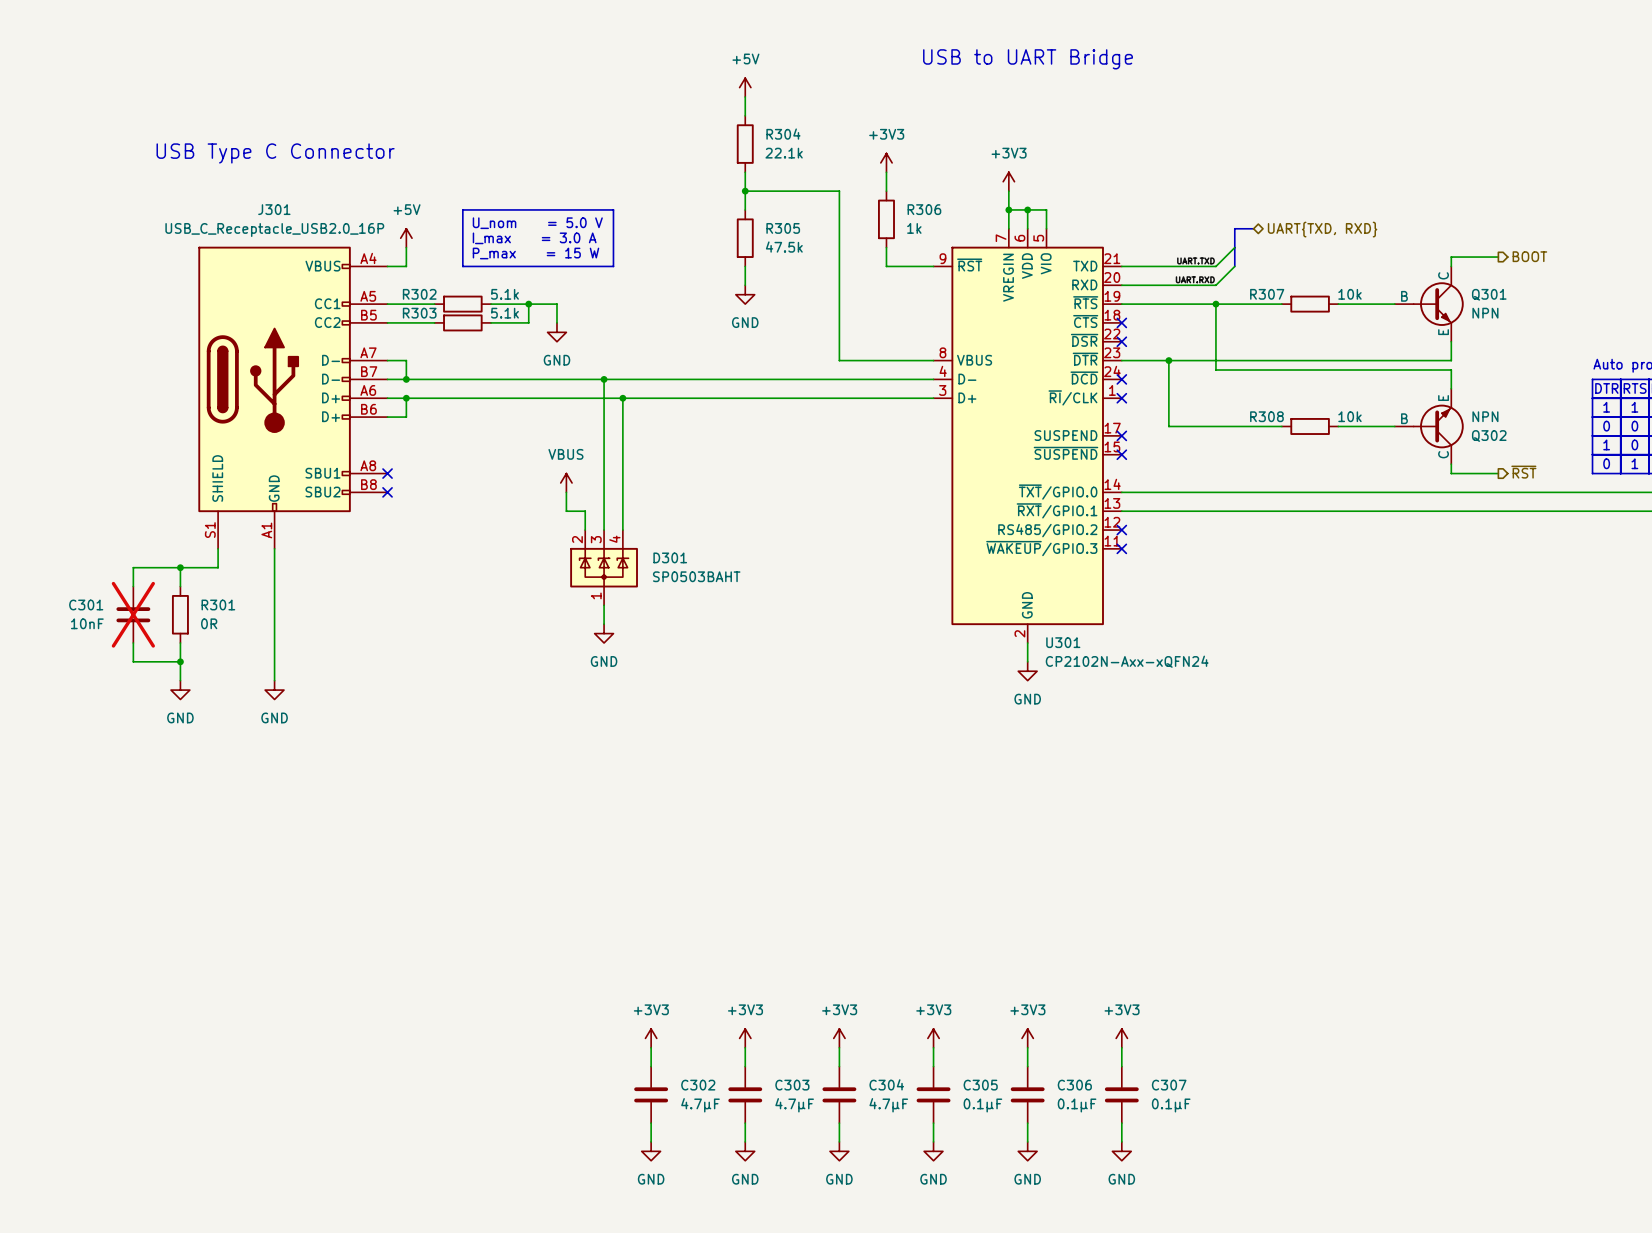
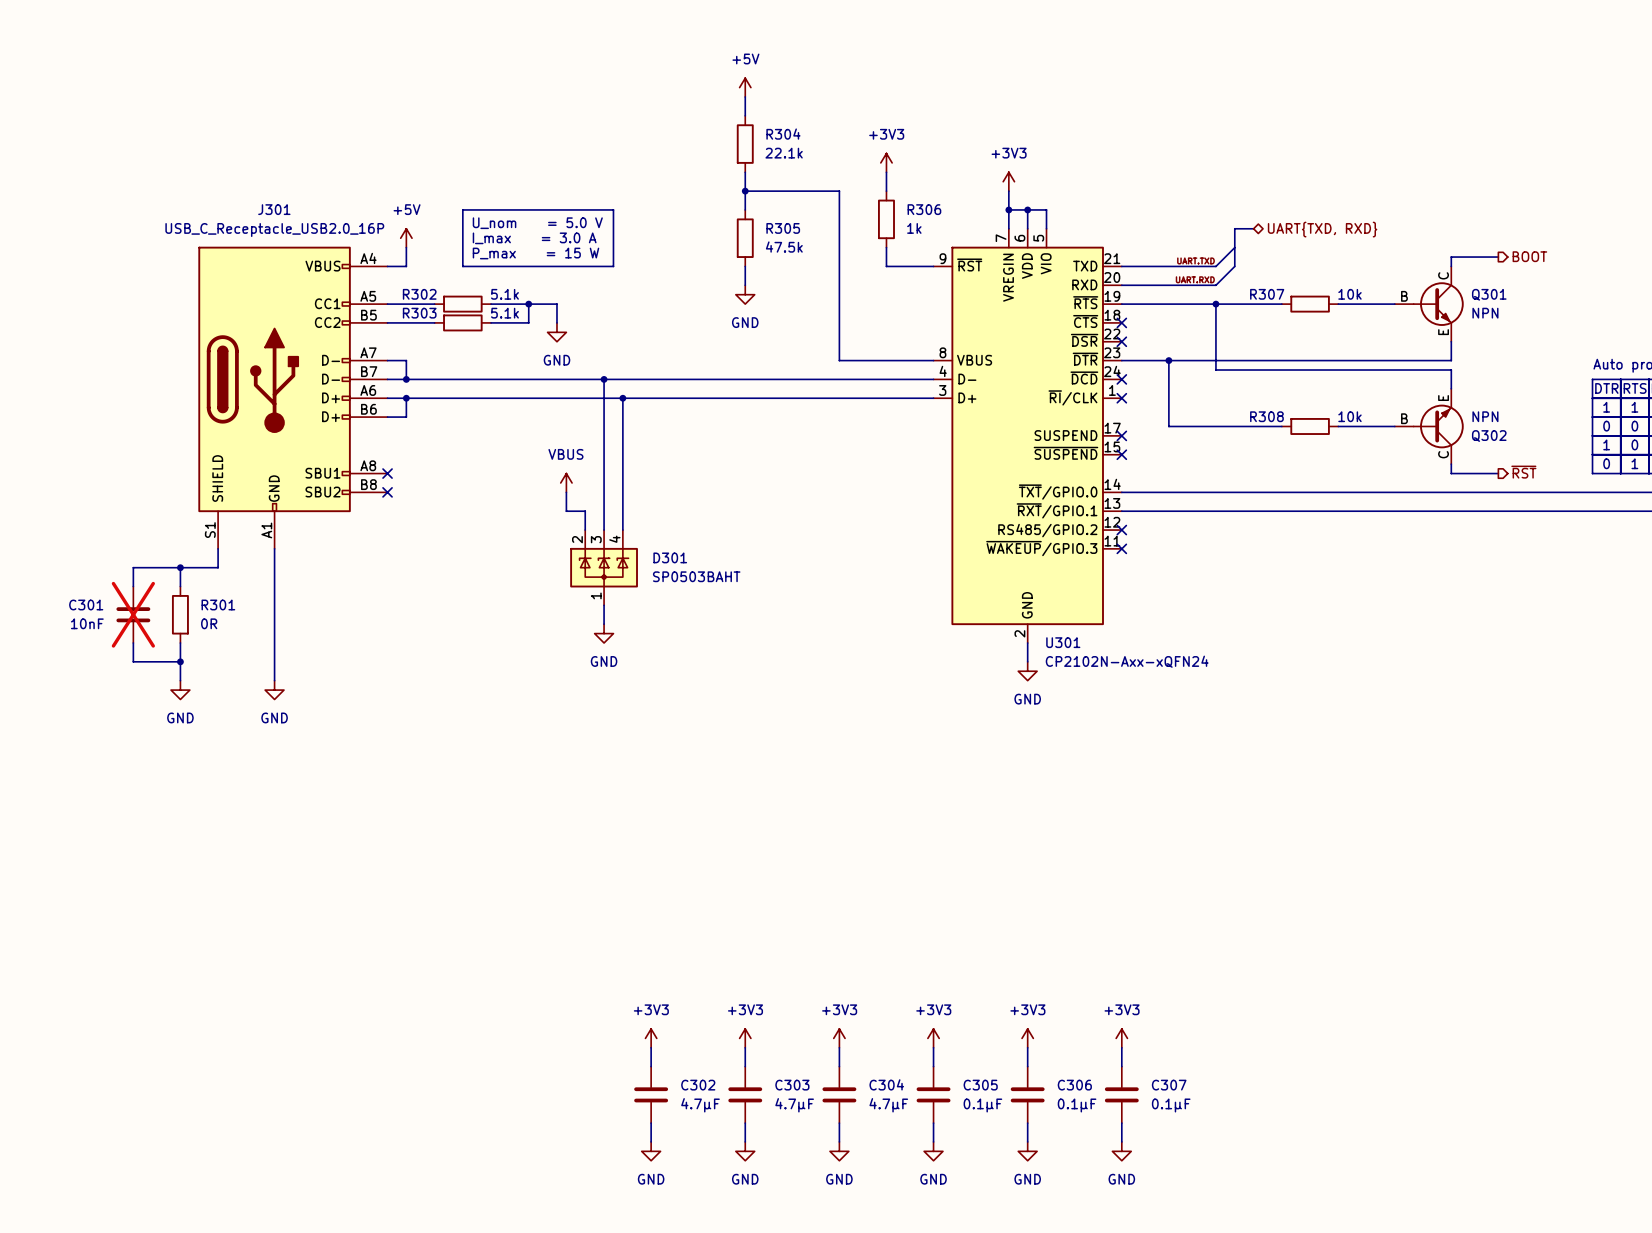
text: USB to UART Bridge (1028, 59) -> none
text: USB Type C Connector (275, 153) -> none

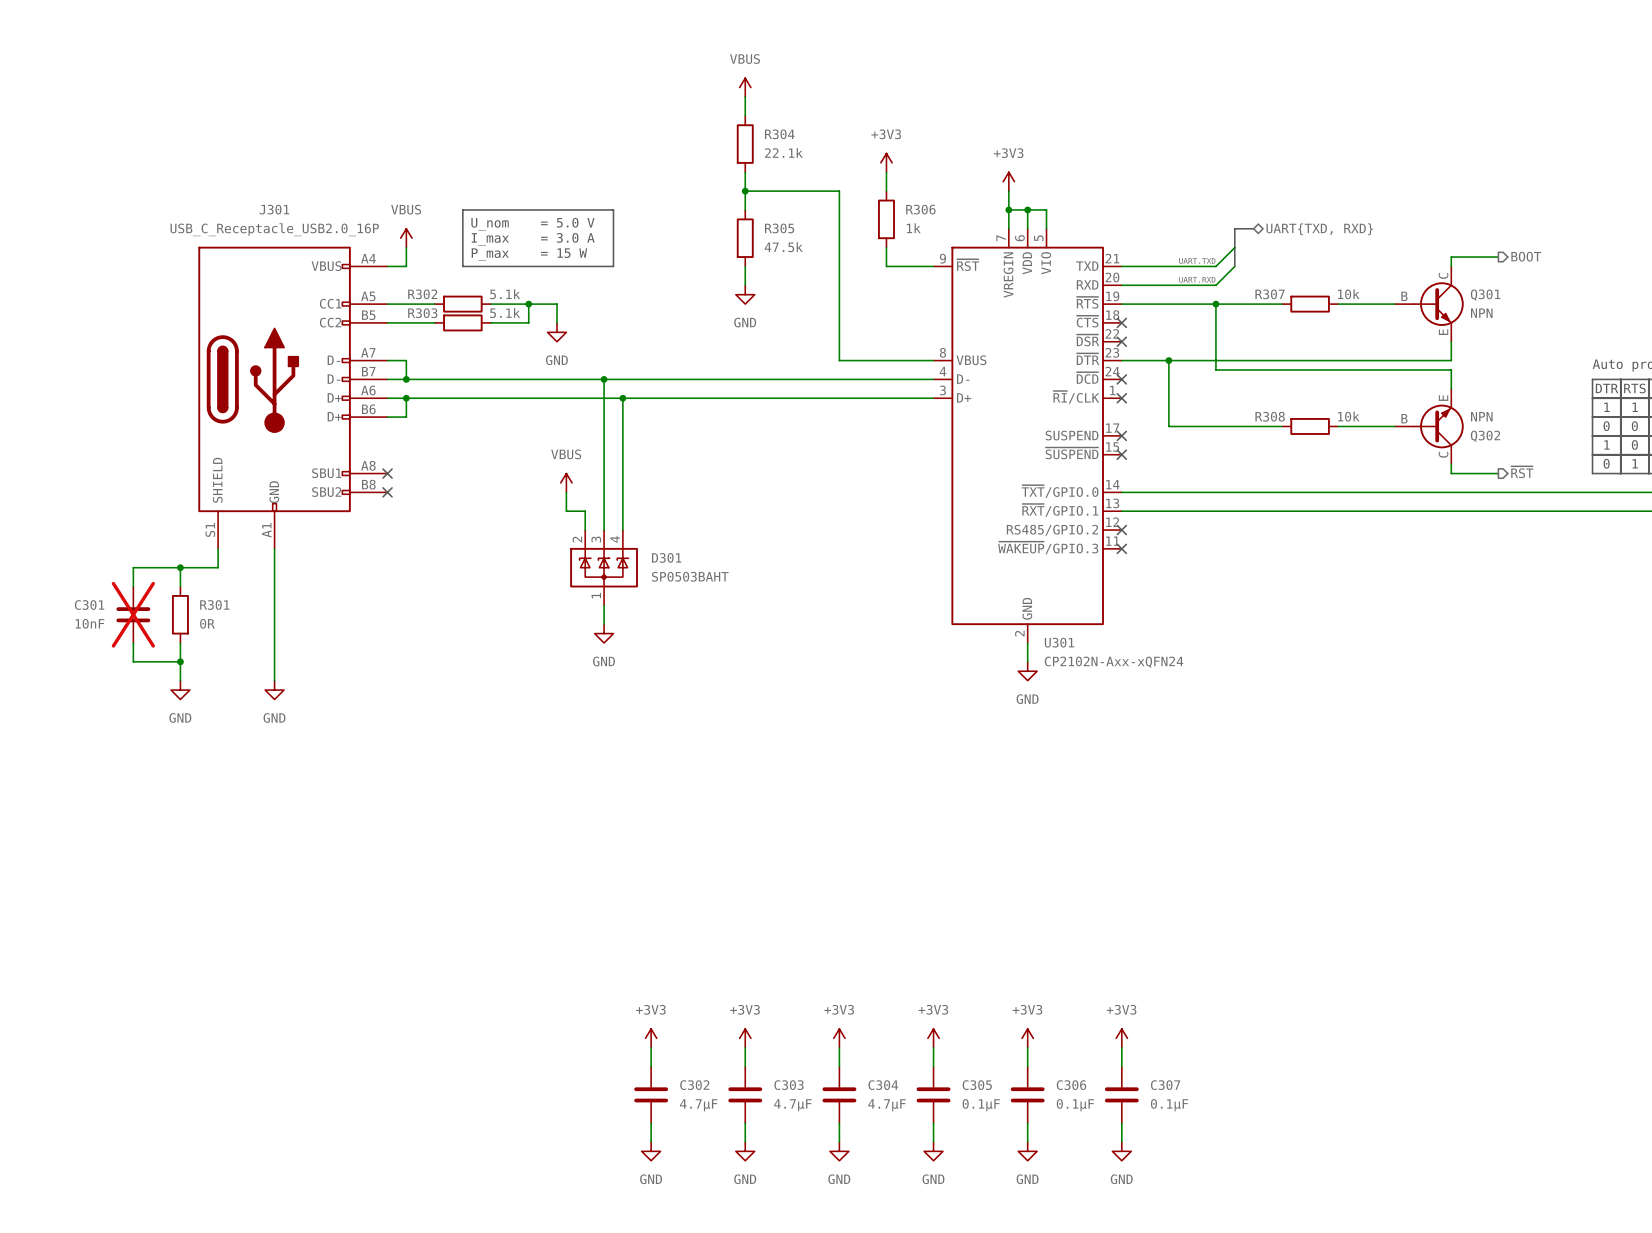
power symbol: +5V (745, 87) -> VBUS (745, 87)
power symbol: +5V (406, 238) -> VBUS (406, 238)

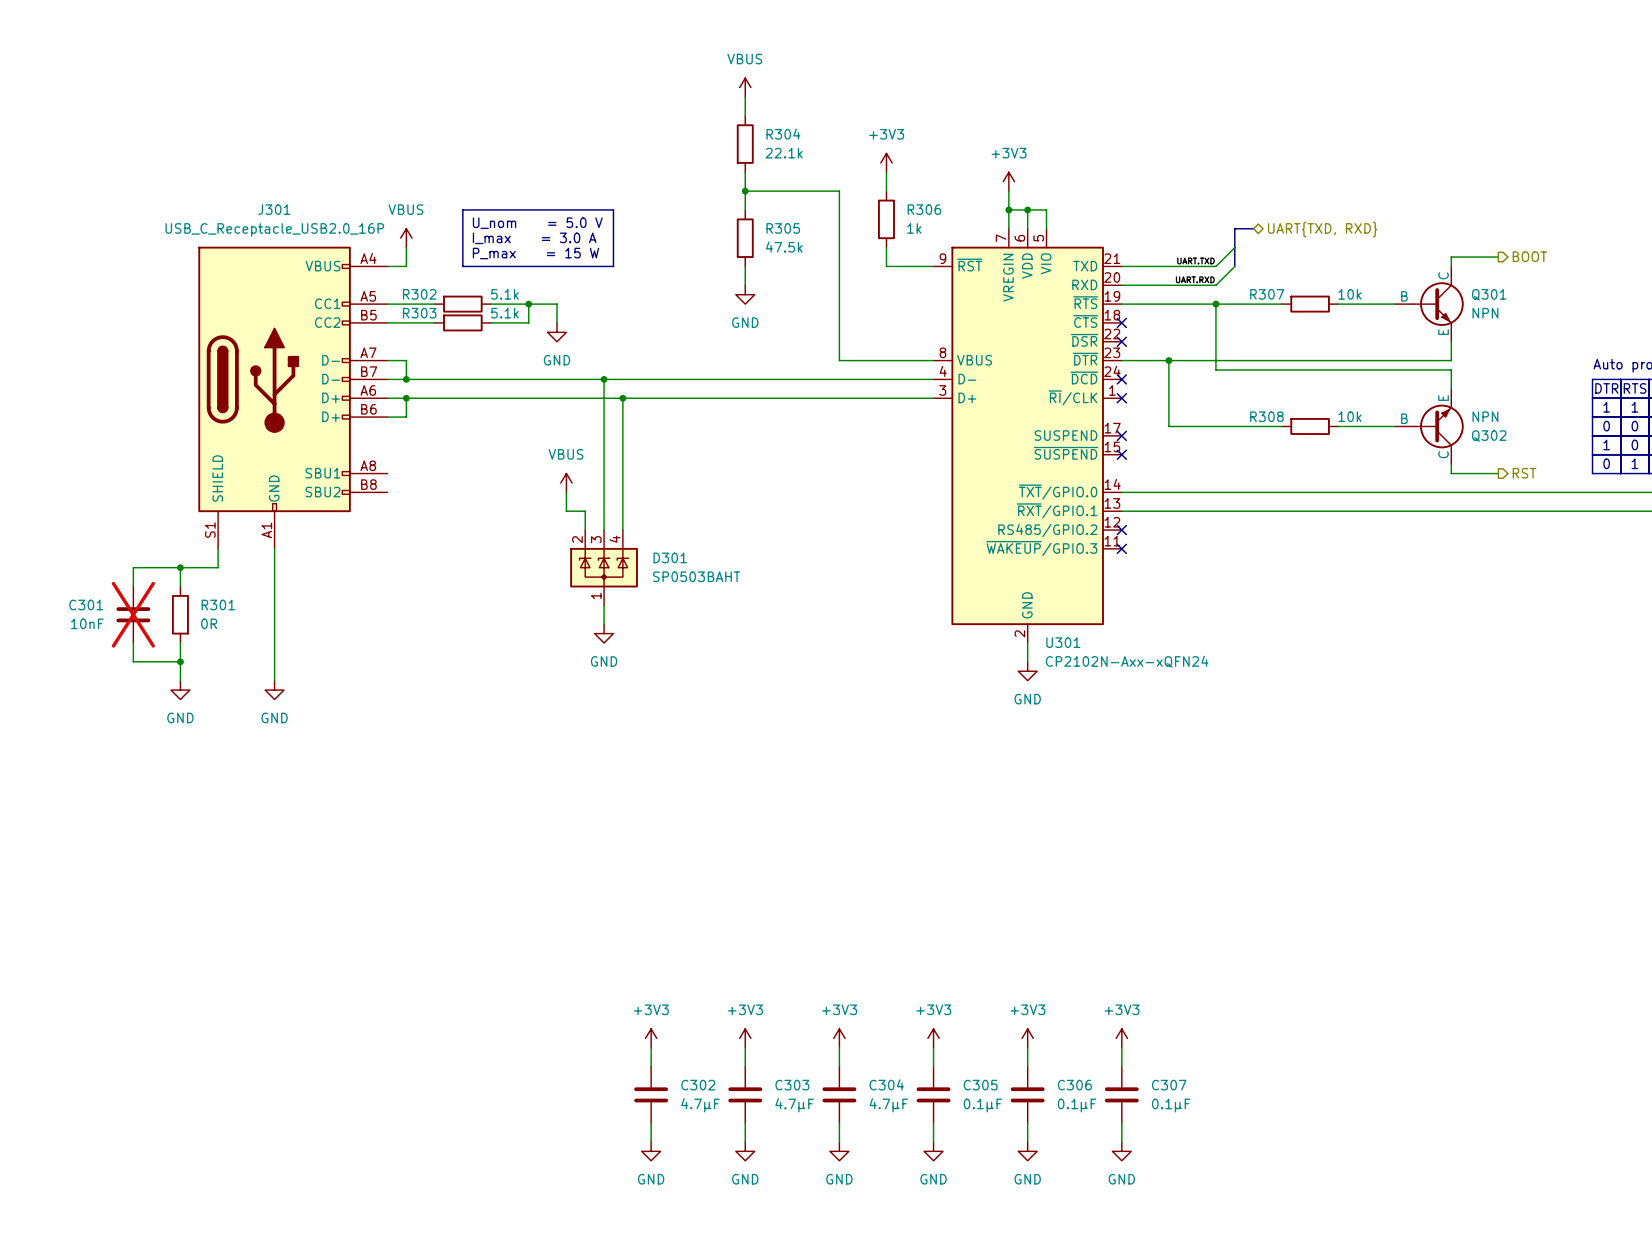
hierarchical label: ~{RST} (1522, 472) -> RST (1524, 473)
no-connect mark: (387, 473) -> none
no-connect mark: (387, 492) -> none

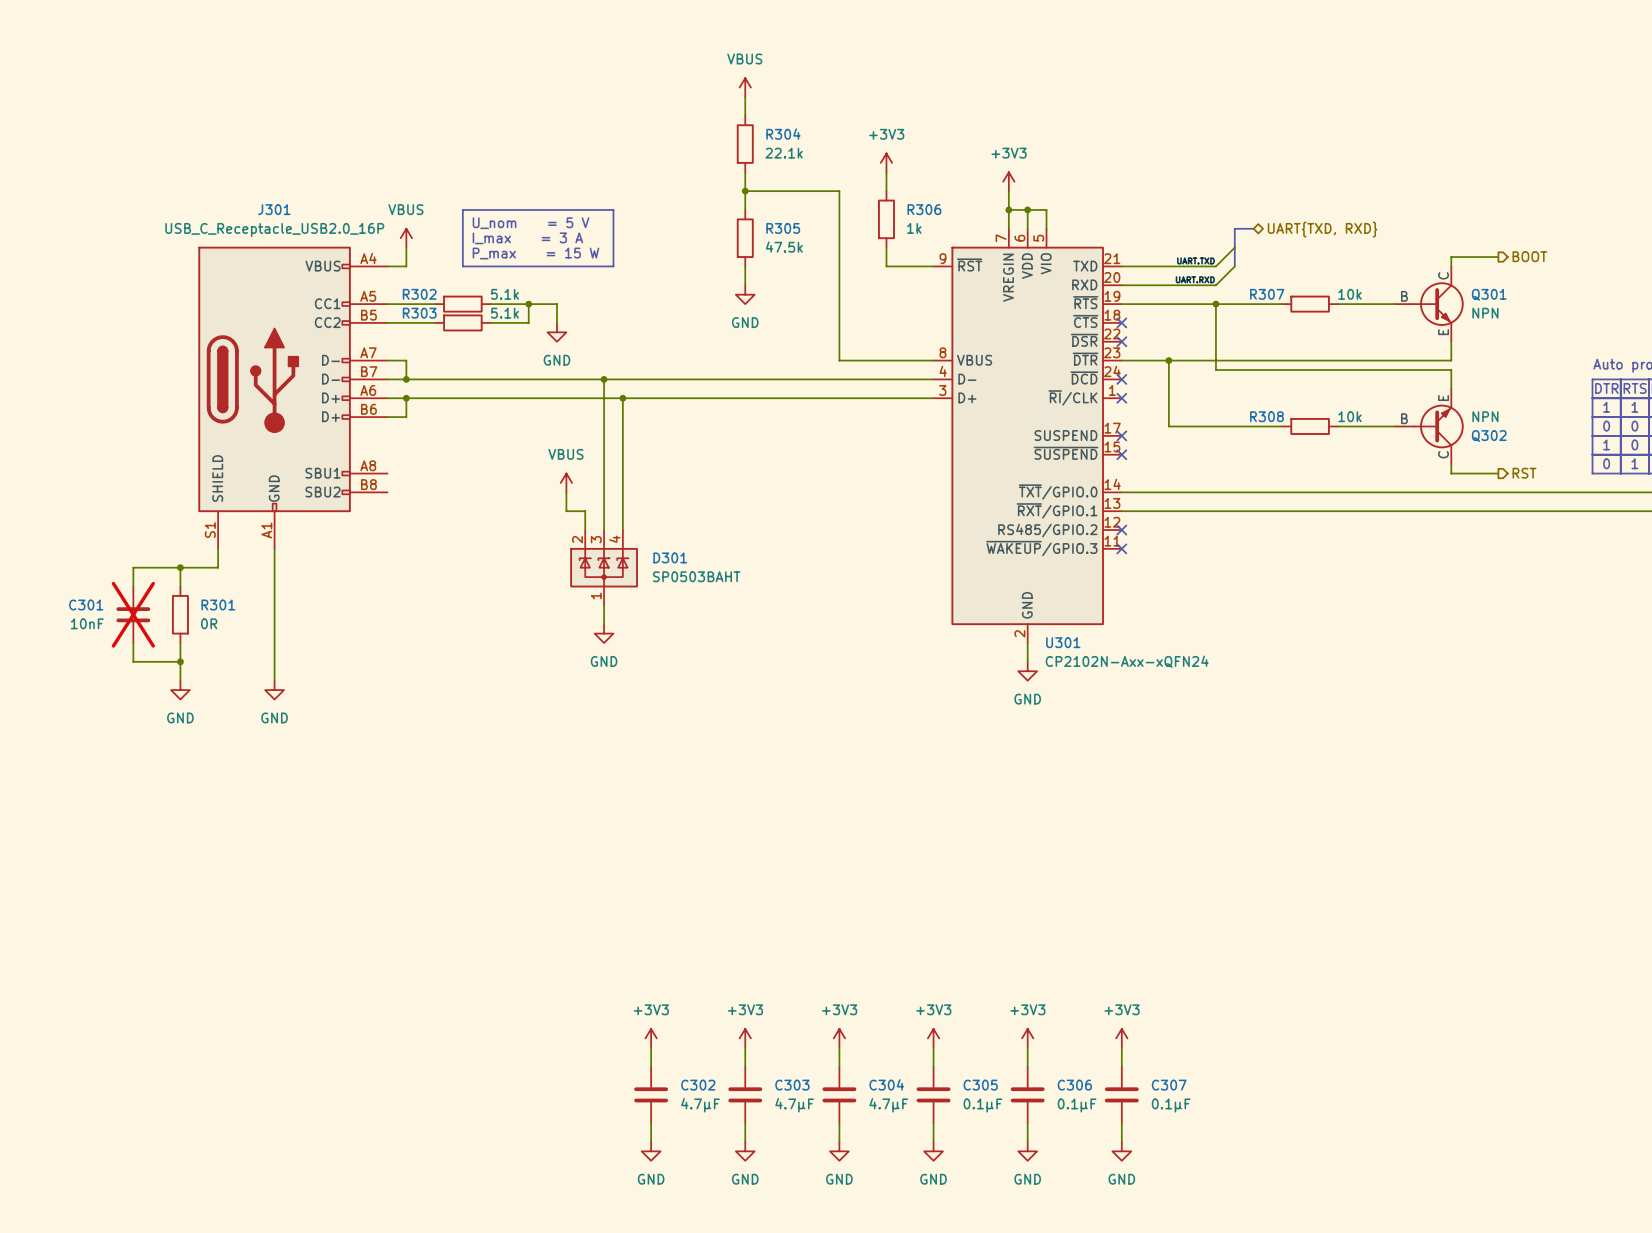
text: U_nom = 5.0 V (537, 223) -> U_nom = 5 V (531, 223)
text: I_max = 3.0 A (534, 238) -> I_max = 3 A (527, 238)

